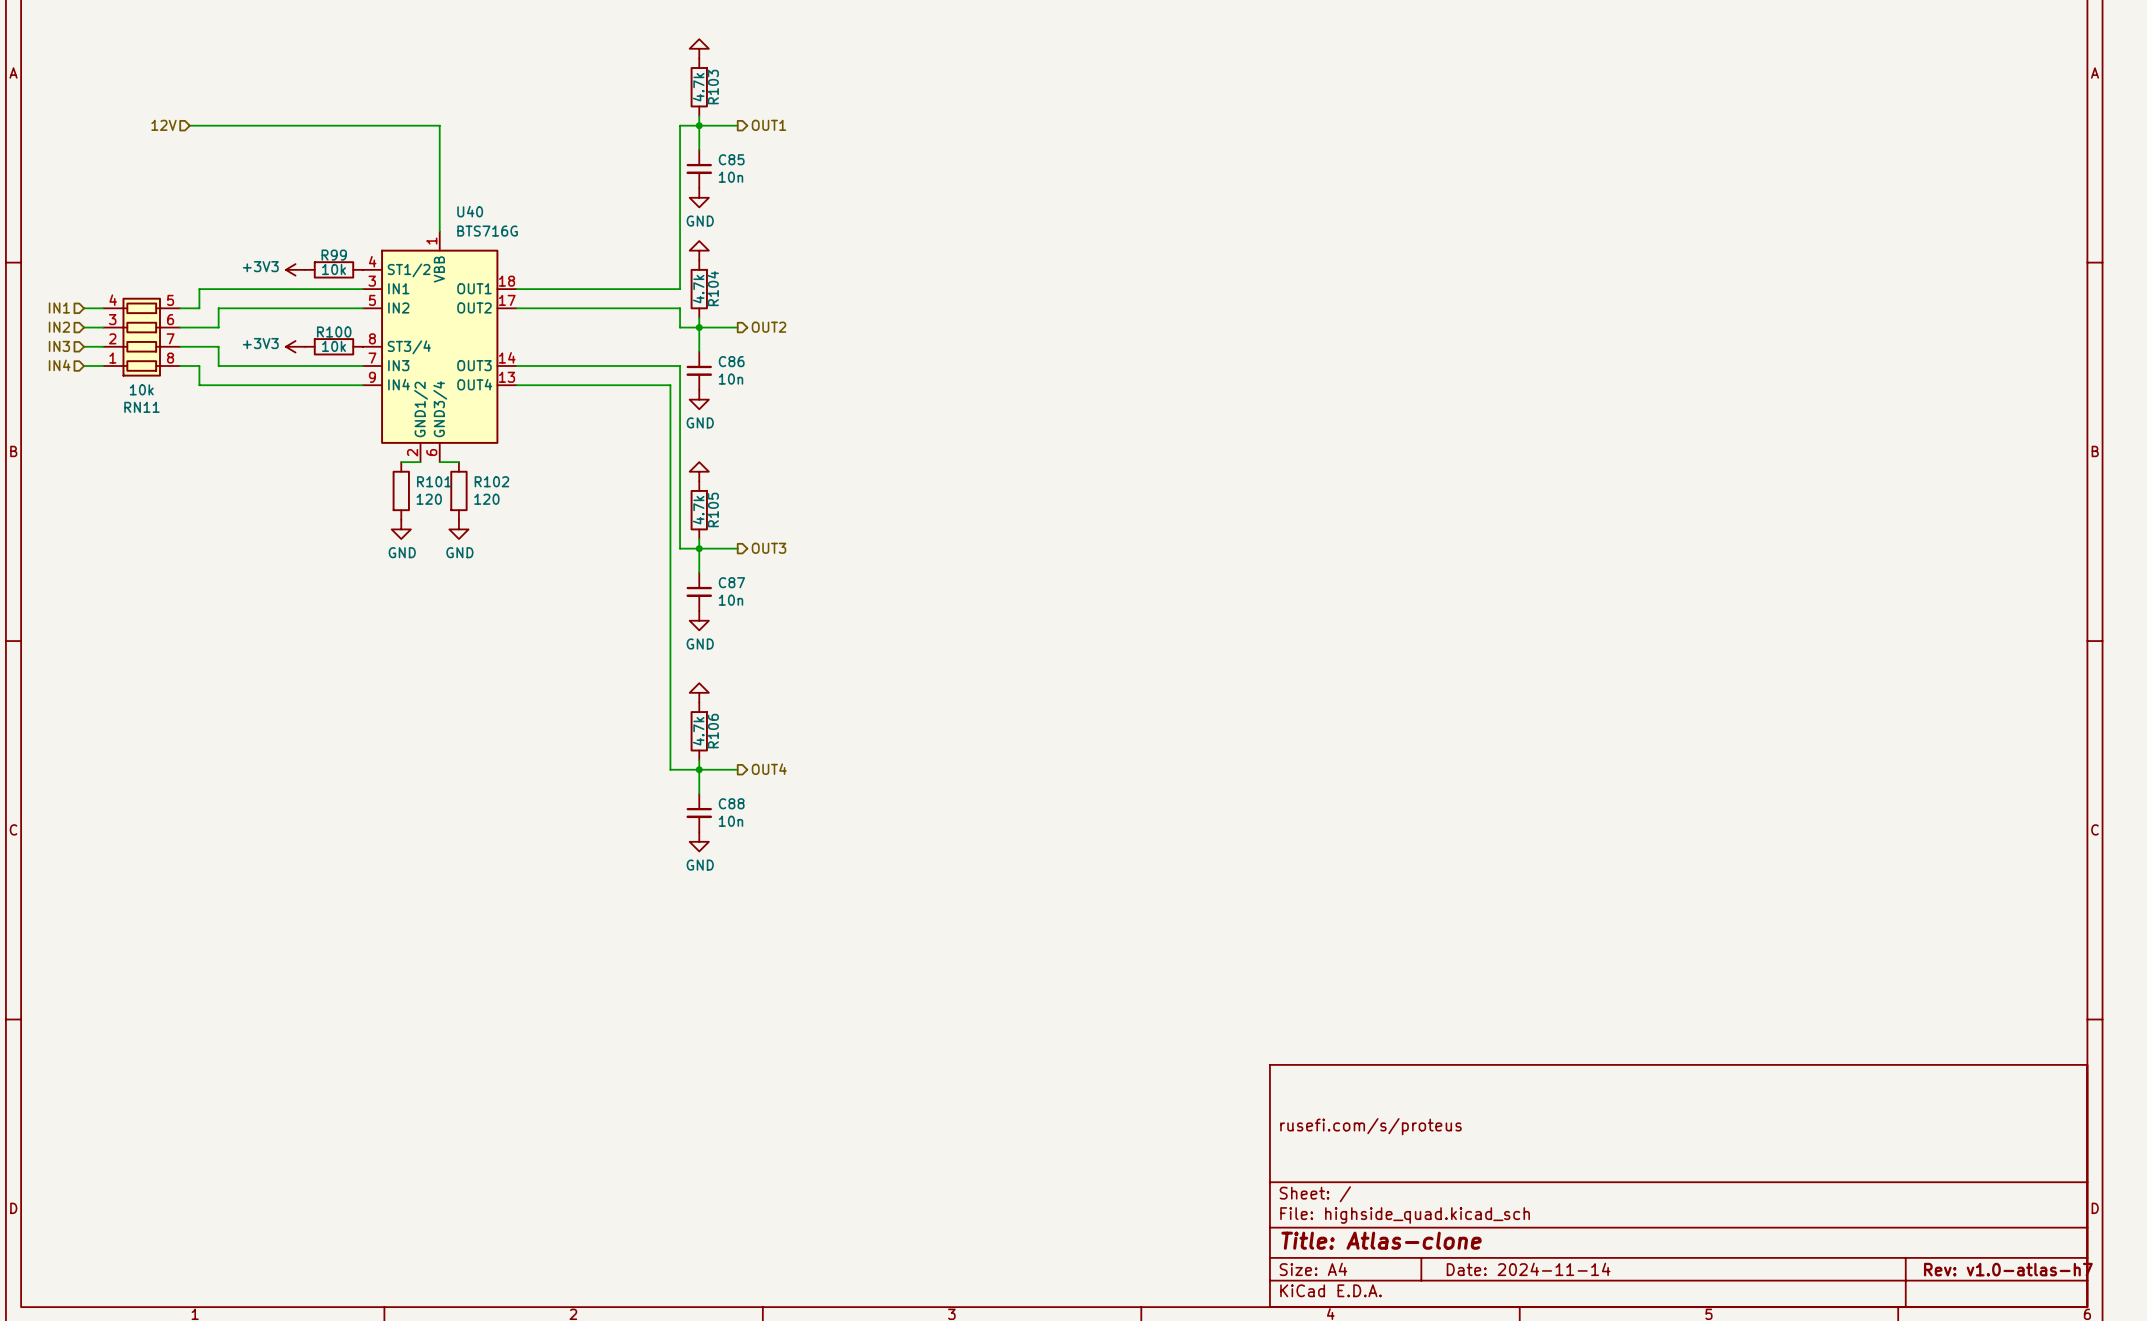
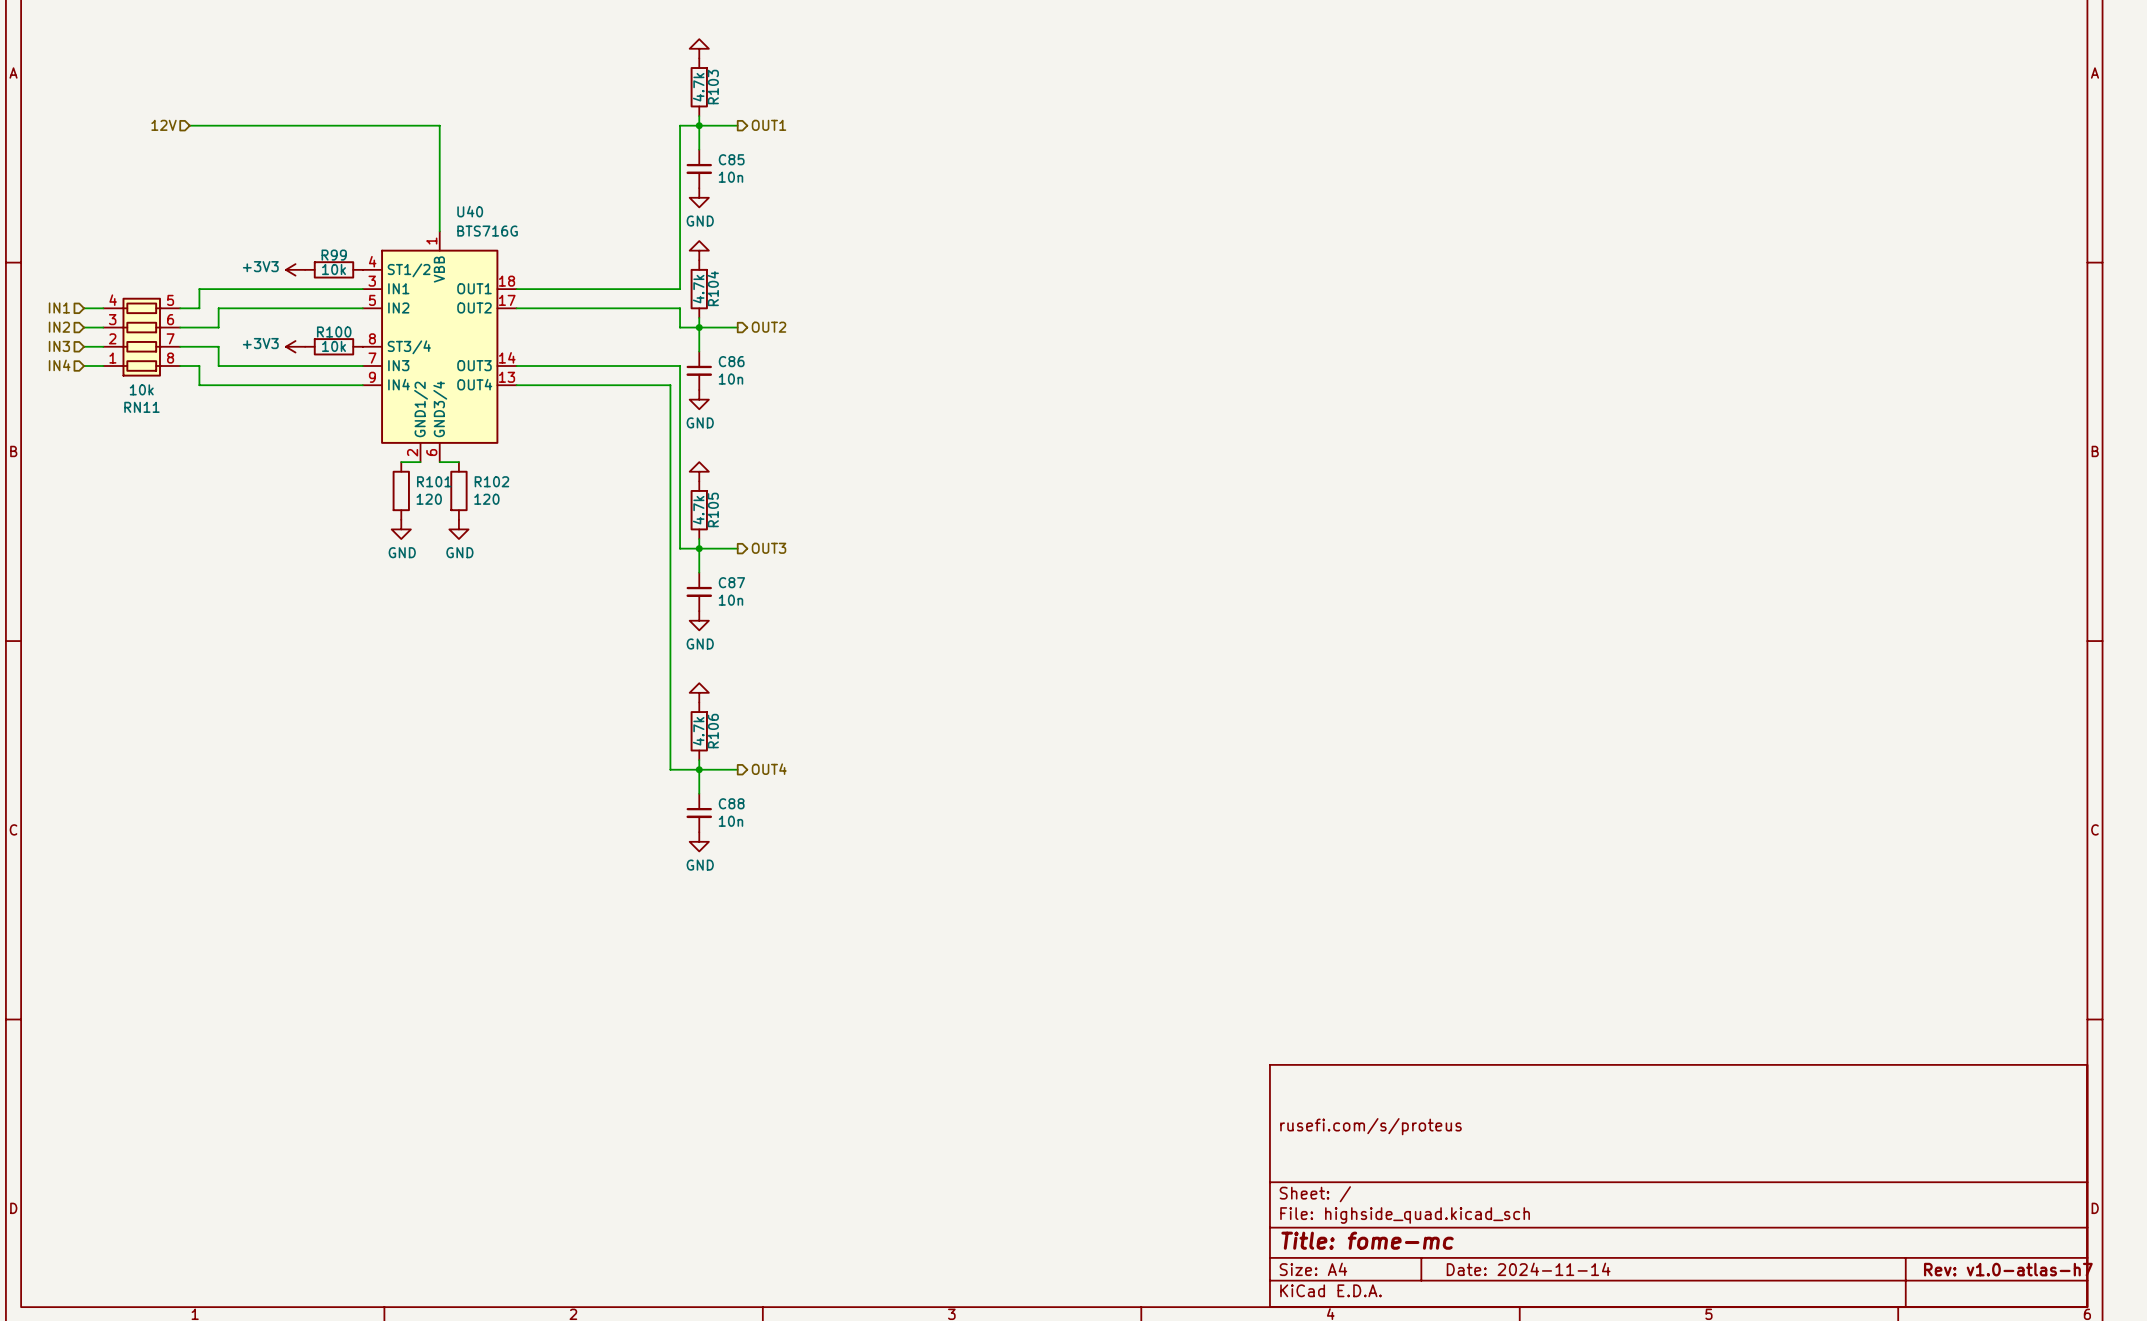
title block: Title: Atlas-clone (1381, 1240) -> Title: fome-mc (1367, 1240)

